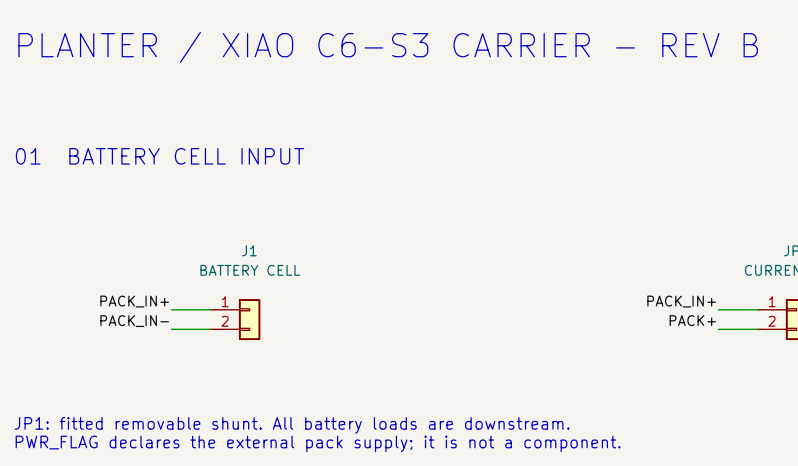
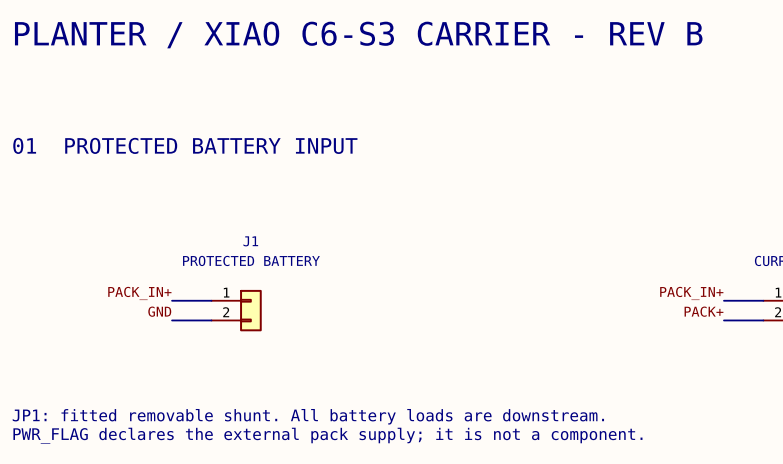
text: 01 BATTERY CELL INPUT (160, 156) -> 01 PROTECTED BATTERY INPUT (185, 145)
J1 value: BATTERY CELL (250, 270) -> PROTECTED BATTERY (251, 260)
label: PACK_IN- (134, 321) -> GND (159, 311)

